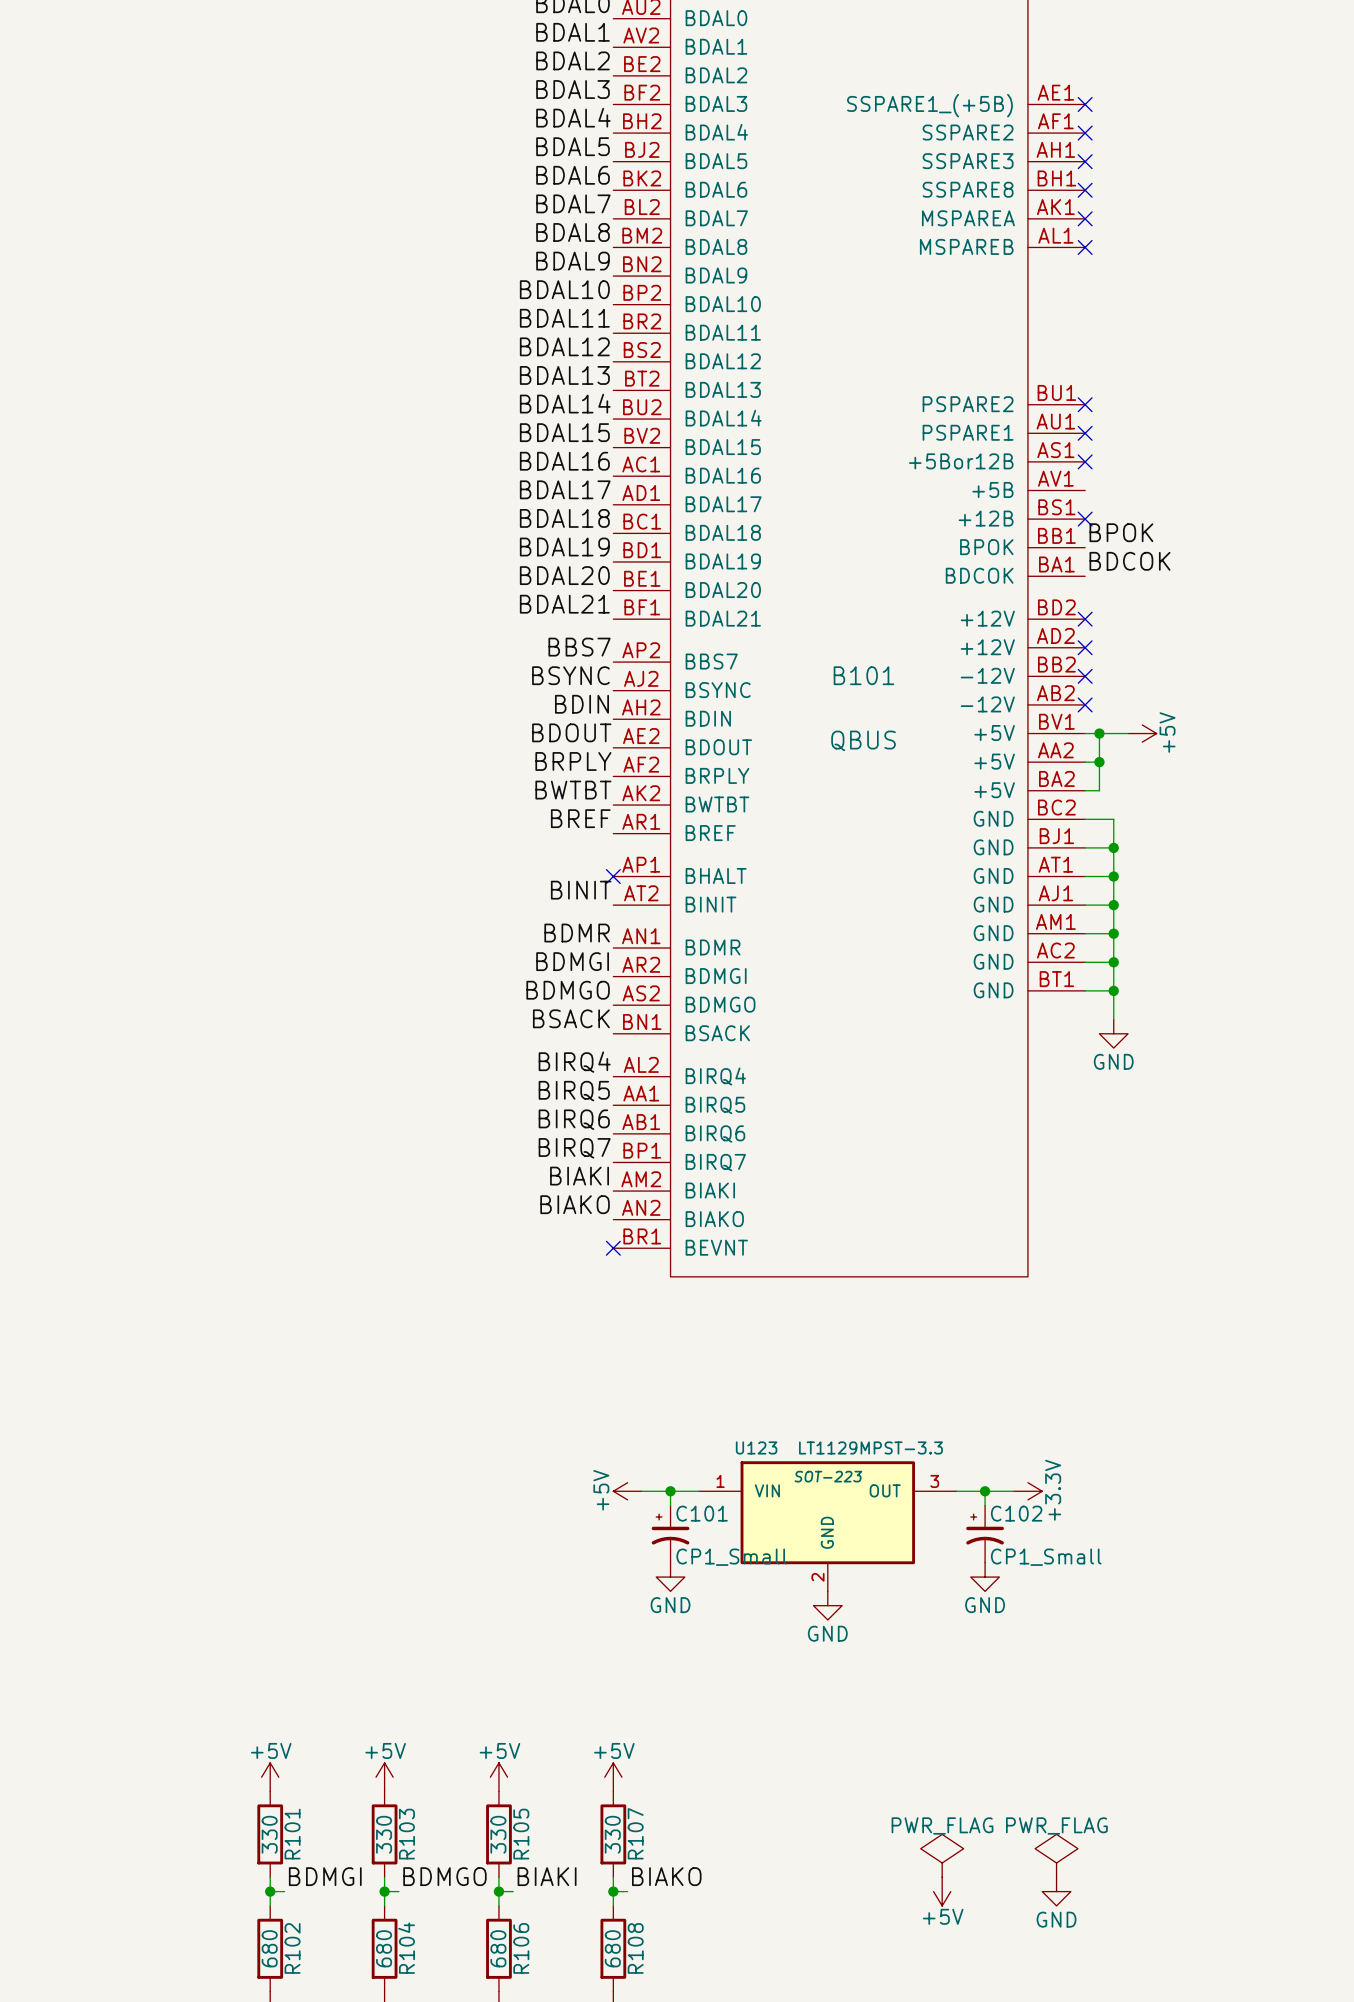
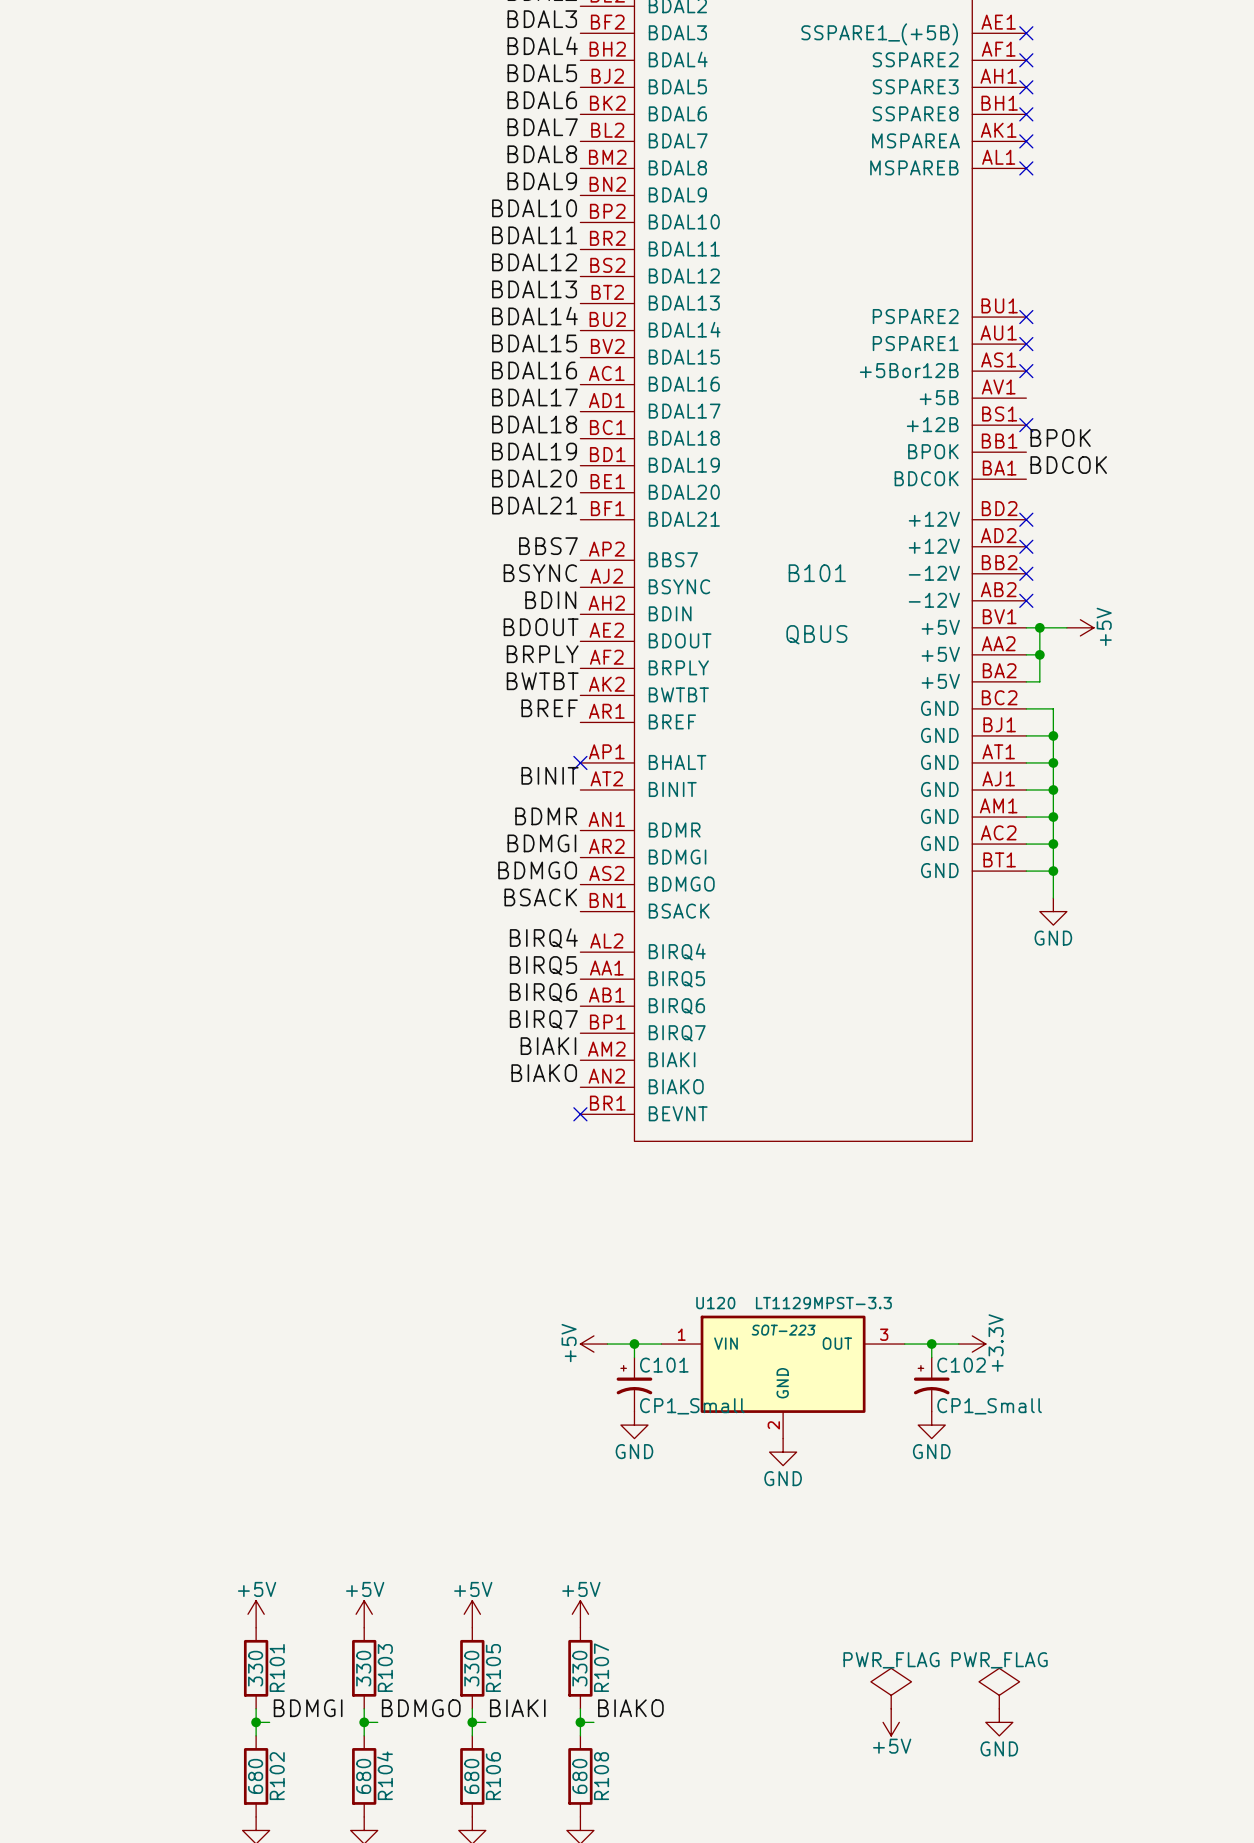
U123 name: U123 (756, 1447) -> U120 (715, 1303)

